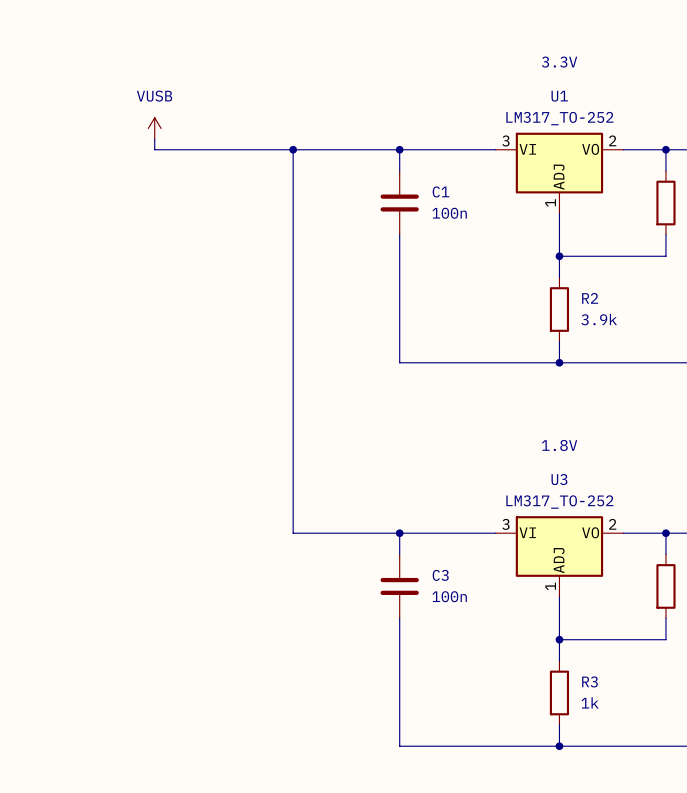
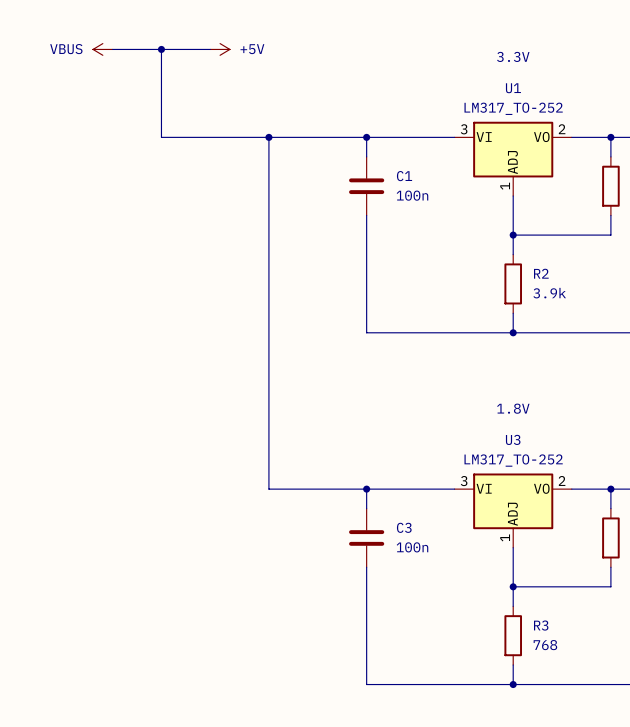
power symbol: none -> VBUS (102, 49)
wire: none -> (112, 49) (210, 49)
junction: none -> (161, 49)
power symbol: none -> +5V (220, 49)
power symbol: VUSB (154, 128) -> none
wire: (154, 139) (154, 149) (176, 149) -> (161, 49) (161, 137)
R3 value: 1k (590, 702) -> 768 (545, 645)

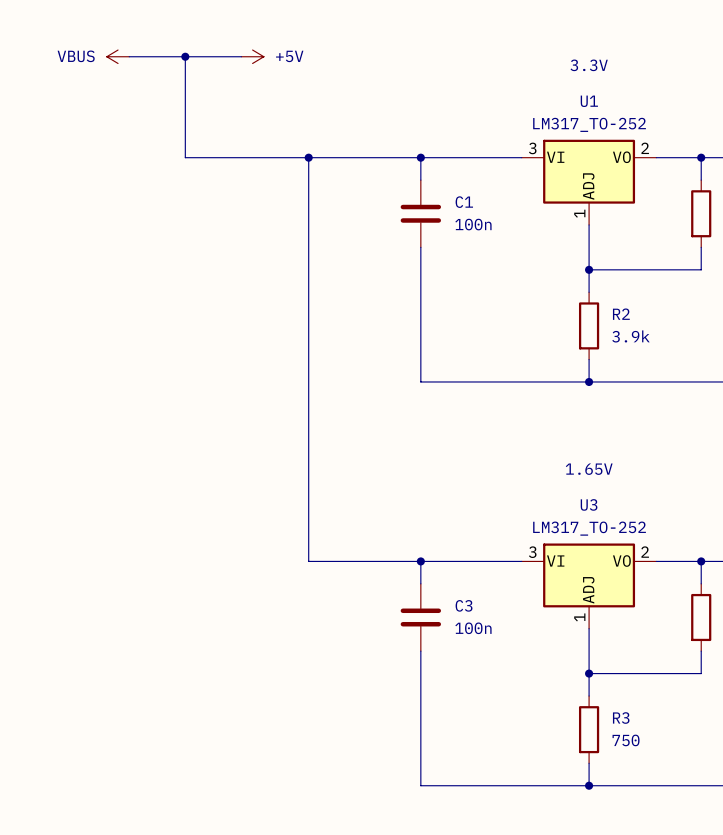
text: 1.8V (513, 408) -> 1.65V (589, 469)
R3 value: 768 (545, 645) -> 750 (626, 740)

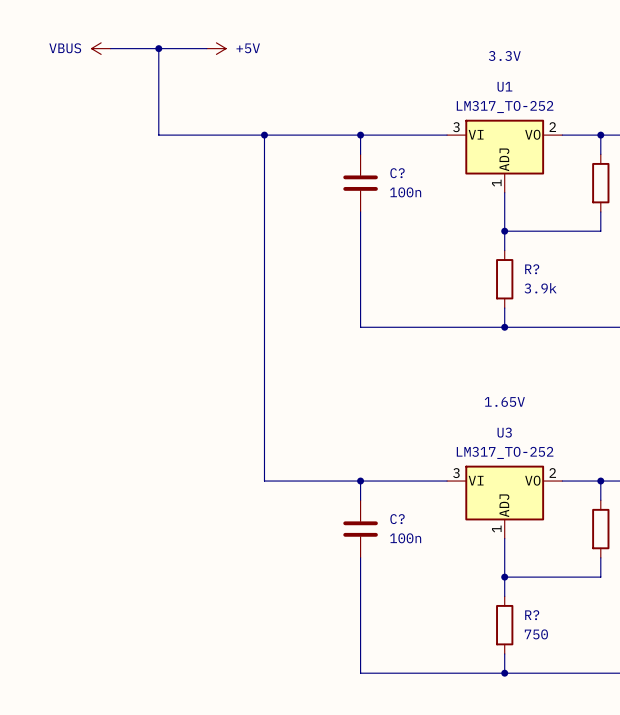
C1 name: C1 (464, 202) -> C? (397, 173)
R2 name: R2 (621, 314) -> R? (532, 269)
C3 name: C3 (464, 605) -> C? (397, 519)
R3 name: R3 (621, 718) -> R? (532, 615)

